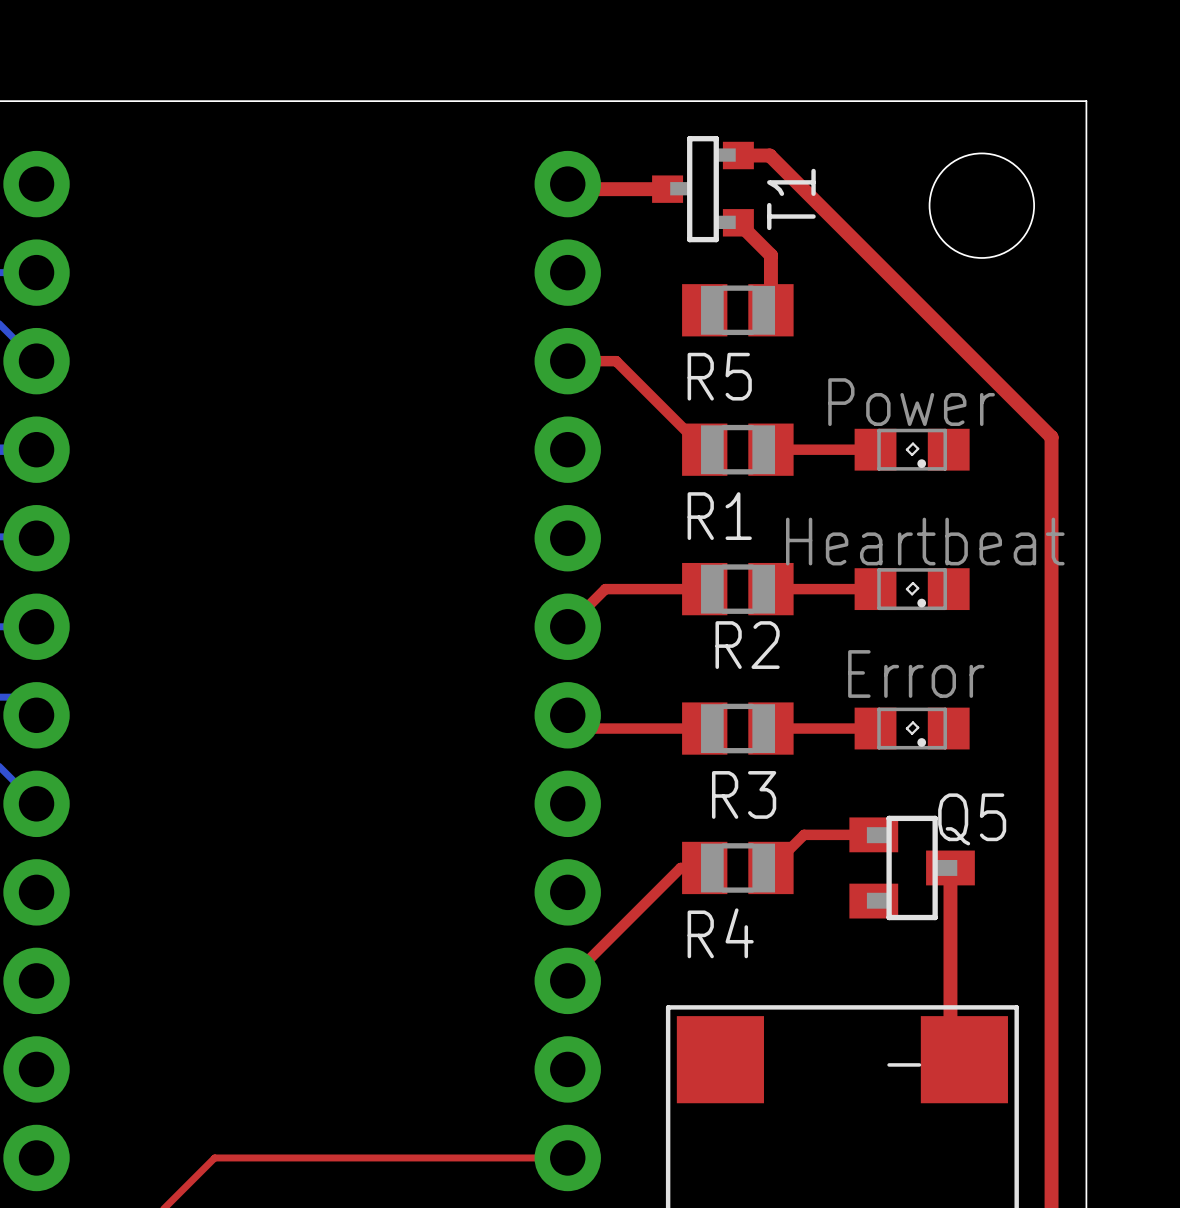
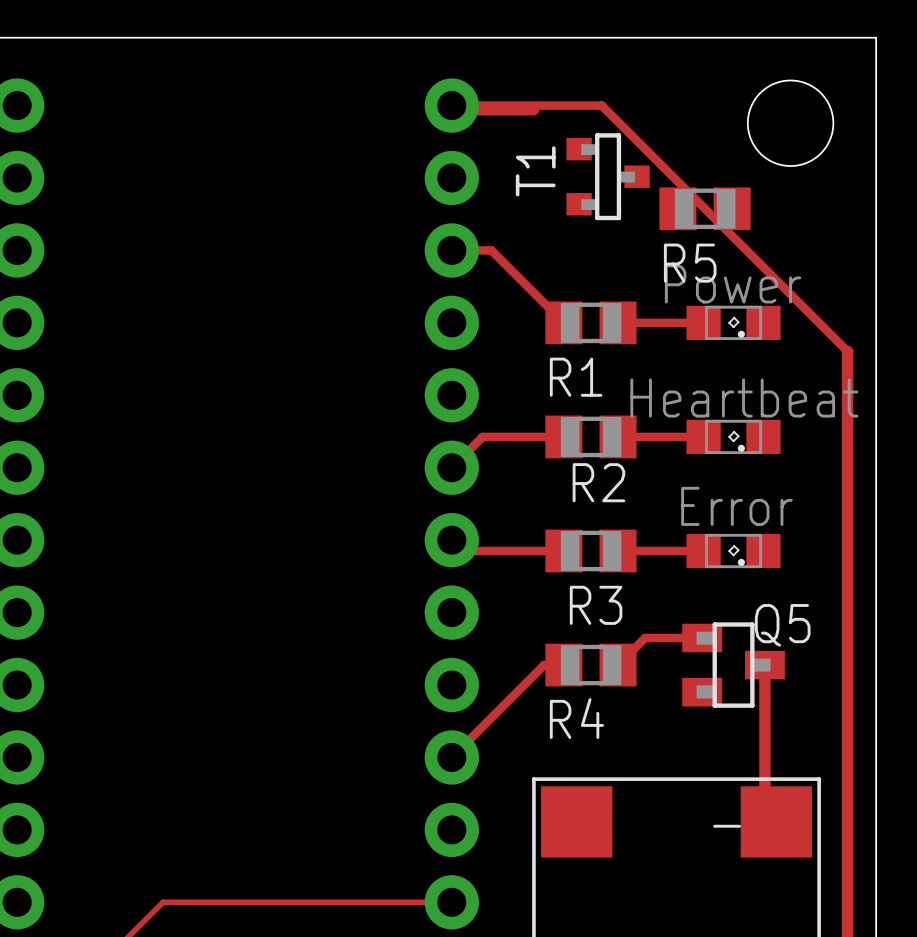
top track: (738, 155) (769, 155) (1051, 437) (1051, 484) -> (451, 105) (601, 105) (847, 351)
T1 rotation: 0° (702, 189) -> 180° (608, 176)
T1 position: (702, 189) -> (608, 176)
top track: (738, 222) (770, 255) (770, 310) -> none
R5 position: (737, 310) -> (705, 208)

